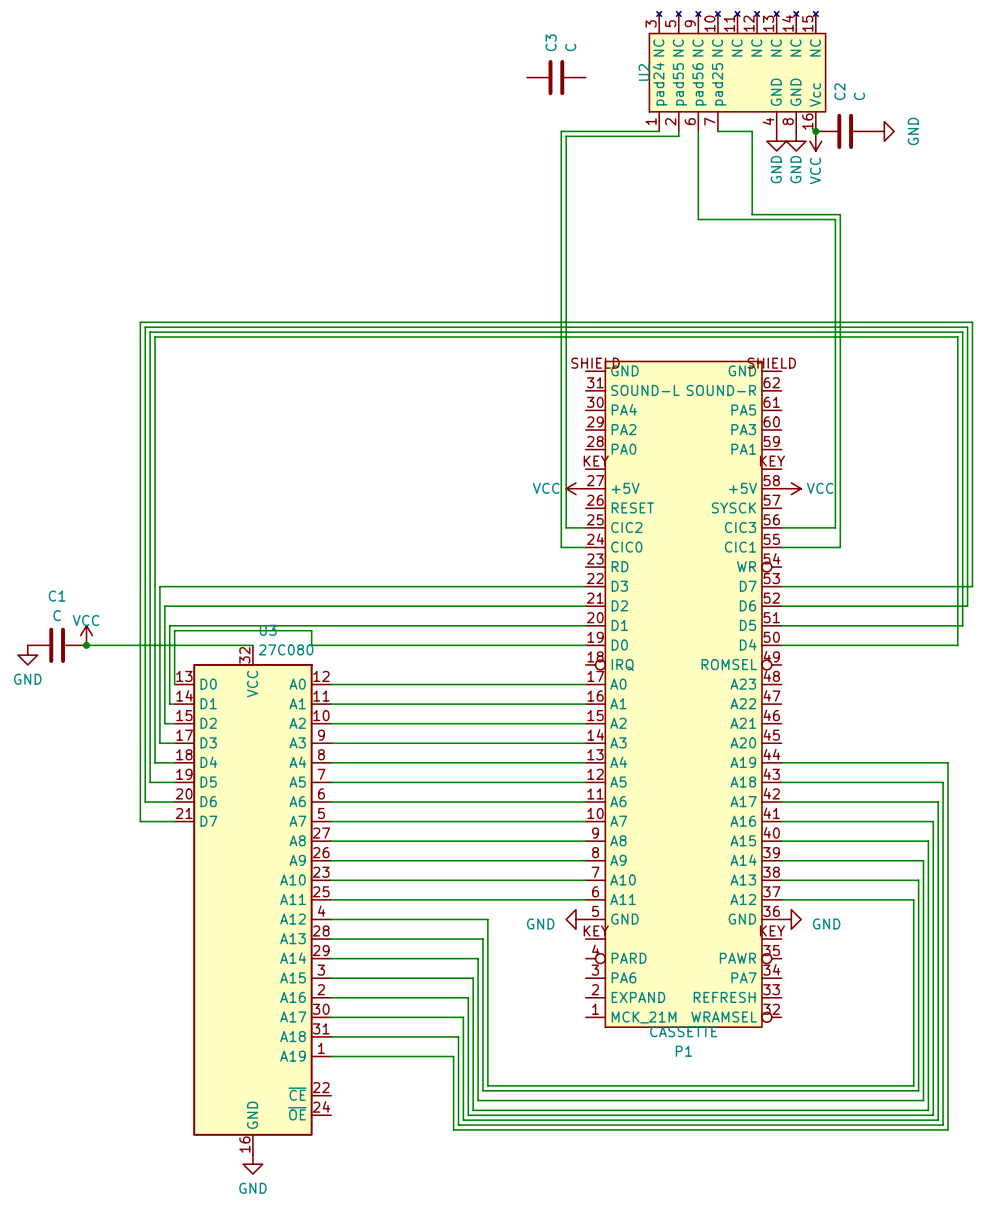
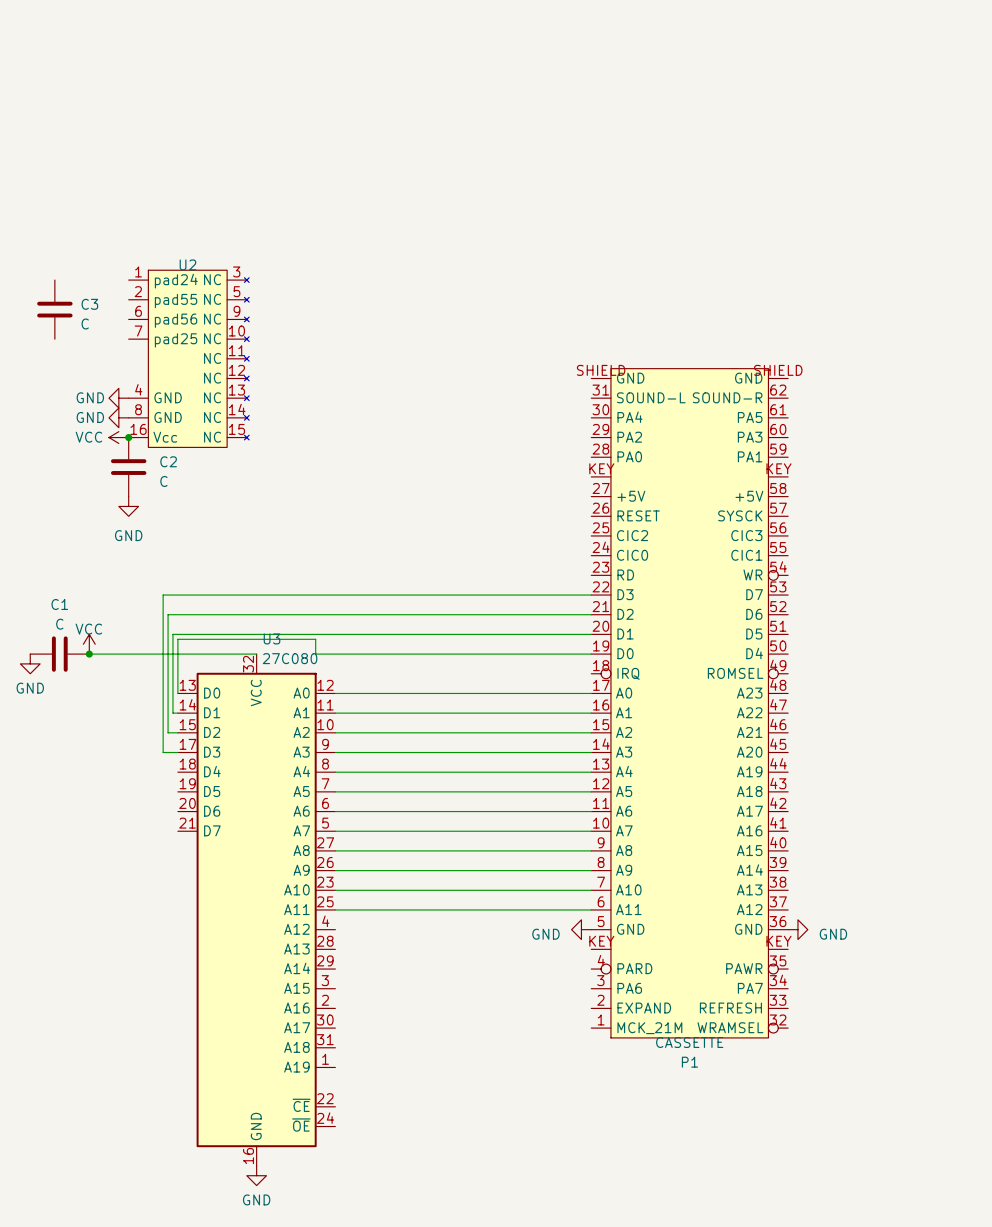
U2 rotation: 0° (737, 61) -> 90° clockwise (198, 358)
U2 position: (737, 71) -> (188, 358)
C3 rotation: 0° (556, 77) -> 90° clockwise (54, 309)
C3 position: (556, 77) -> (54, 309)
wire: (659, 131) (561, 131) (561, 547) (585, 547) -> none
wire: (678, 131) (678, 136) (566, 136) (566, 527) (585, 527) -> none
wire: (698, 131) (698, 219) (835, 219) (835, 527) (781, 527) -> none
wire: (717, 131) (752, 131) (752, 214) (840, 214) (840, 547) (781, 547) -> none
junction: (815, 131) -> none
C2 rotation: 0° (845, 131) -> 90° clockwise (128, 467)
C2 position: (845, 131) -> (128, 467)
power symbol: GND (884, 131) -> none
power symbol: GND (776, 141) -> none
power symbol: GND (796, 141) -> none
power symbol: VCC (815, 141) -> none
power symbol: none -> GND (118, 398)
power symbol: none -> GND (118, 417)
power symbol: none -> VCC (118, 437)
junction: none -> (128, 437)
power symbol: VCC (575, 488) -> none
power symbol: VCC (791, 488) -> none
power symbol: none -> GND (128, 506)
wire: (781, 586) (972, 586) (972, 322) (140, 322) (140, 821) (174, 821) -> none
wire: (781, 606) (967, 606) (967, 327) (145, 327) (145, 801) (174, 801) -> none
wire: (781, 625) (962, 625) (962, 332) (150, 332) (150, 782) (174, 782) -> none
wire: (781, 645) (957, 645) (957, 337) (155, 337) (155, 762) (174, 762) -> none
wire: (781, 762) (947, 762) (947, 1129) (453, 1129) (453, 1056) (331, 1056) -> none
wire: (781, 782) (943, 782) (943, 1125) (458, 1125) (458, 1036) (331, 1036) -> none
wire: (781, 801) (938, 801) (938, 1120) (463, 1120) (463, 1017) (331, 1017) -> none
wire: (781, 821) (933, 821) (933, 1115) (468, 1115) (468, 997) (331, 997) -> none
wire: (781, 841) (928, 841) (928, 1110) (473, 1110) (473, 978) (331, 978) -> none
wire: (781, 860) (923, 860) (923, 1100) (478, 1100) (478, 958) (331, 958) -> none
wire: (781, 880) (918, 880) (918, 1090) (482, 1090) (482, 939) (331, 939) -> none
wire: (781, 899) (913, 899) (913, 1085) (487, 1085) (487, 919) (331, 919) -> none

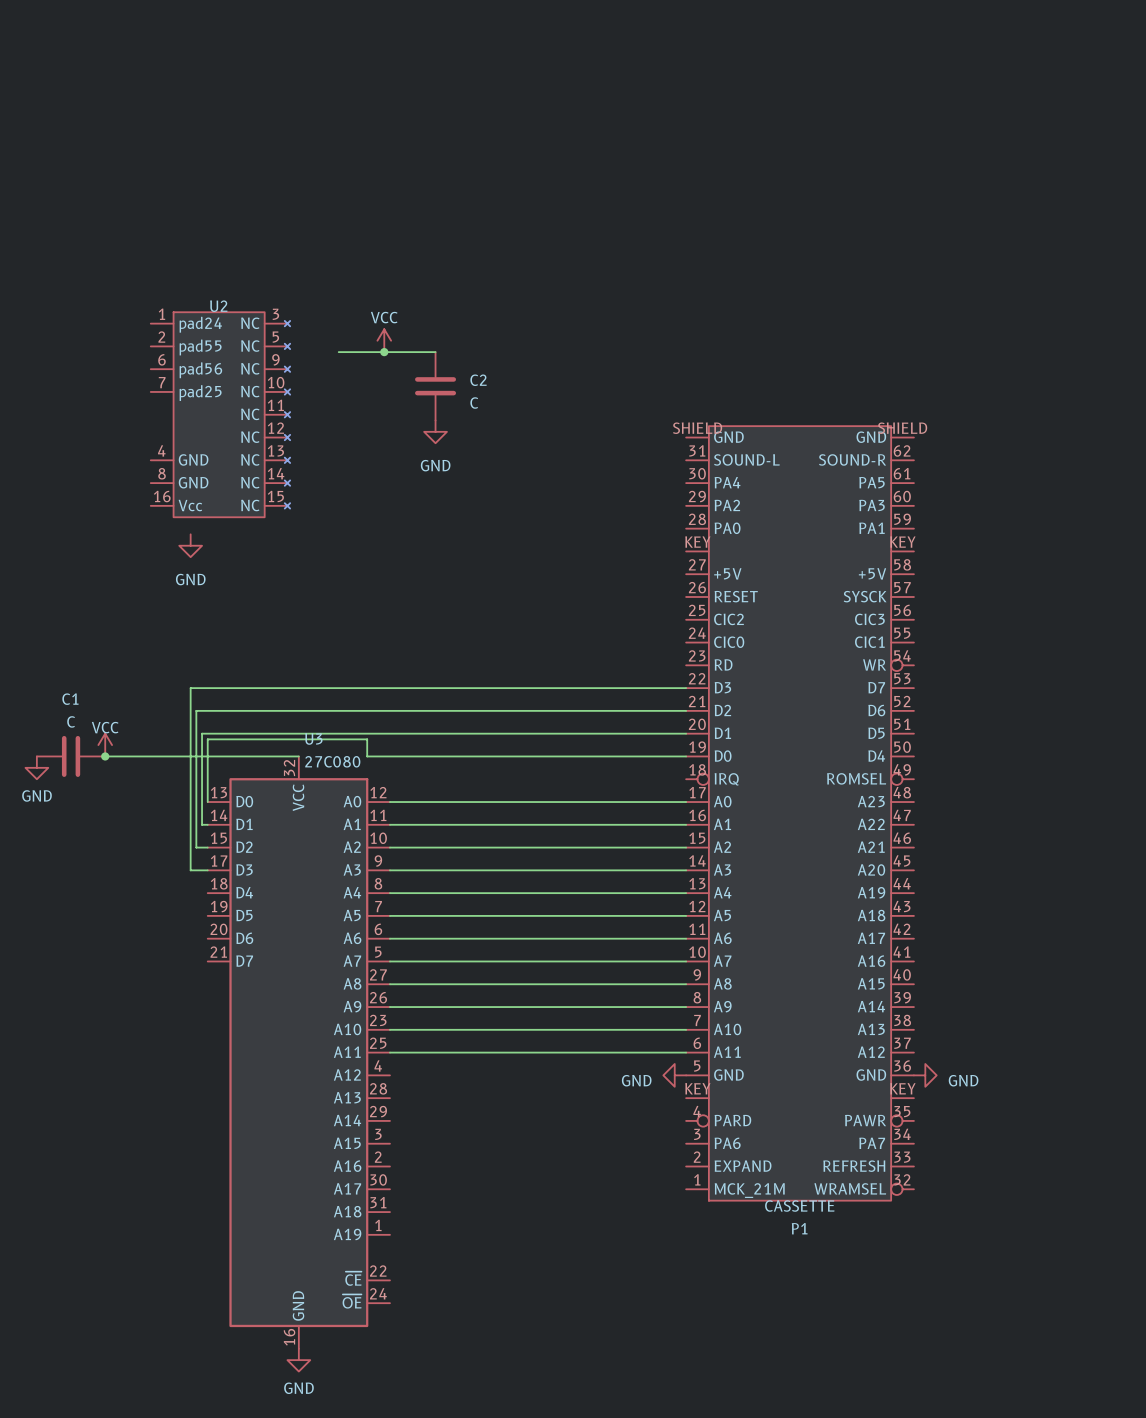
power symbol: none -> VCC (384, 340)
wire: none -> (338, 352) (435, 352)
junction: none -> (384, 352)
C3: C (54, 309) -> none
power symbol: none -> GND (435, 431)
power symbol: GND (118, 398) -> none
power symbol: GND (118, 417) -> none
power symbol: VCC (118, 437) -> none
junction: (128, 437) -> none
C2 position: (128, 467) -> (435, 386)
power symbol: none -> GND (190, 545)
power symbol: GND (128, 506) -> none

